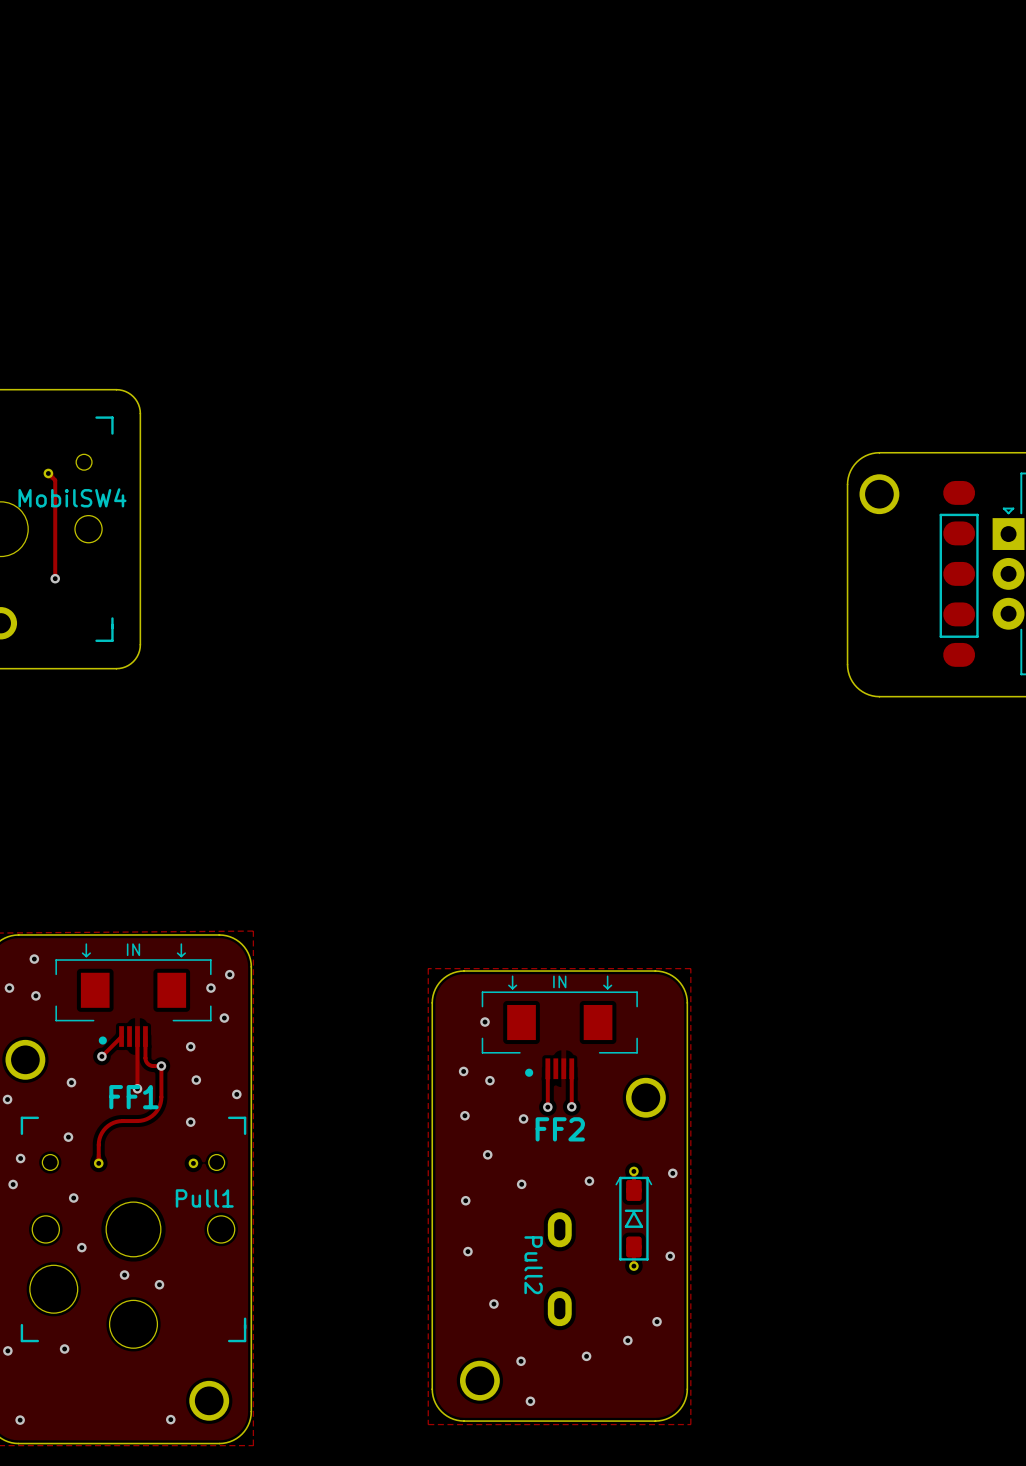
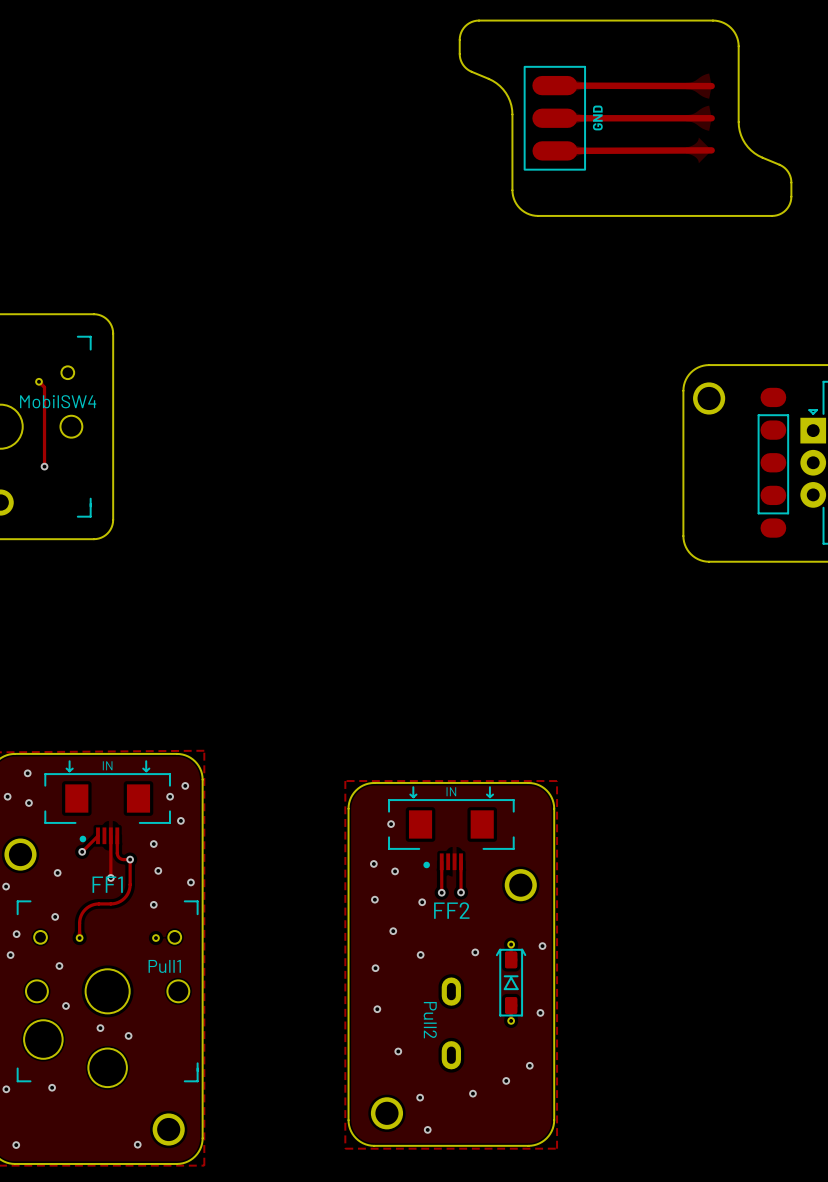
board edge: none -> (479, 20) (712, 20) (726, 24) (734, 32) (738, 43) (738, 122) (741, 135) (745, 143) (754, 153) (781, 165) (788, 171) (791, 182) (791, 199) (788, 206) (781, 213) (772, 215) (538, 215) (524, 212) (516, 203) (512, 193) (512, 114) (510, 101) (500, 86) (467, 69) (460, 58) (459, 37) (462, 30) (469, 23) (479, 20)
track: none -> (554, 85) (711, 86)
track: none -> (554, 118) (711, 118)
part: none -> (554, 118)
track: none -> (711, 150) (554, 150)

